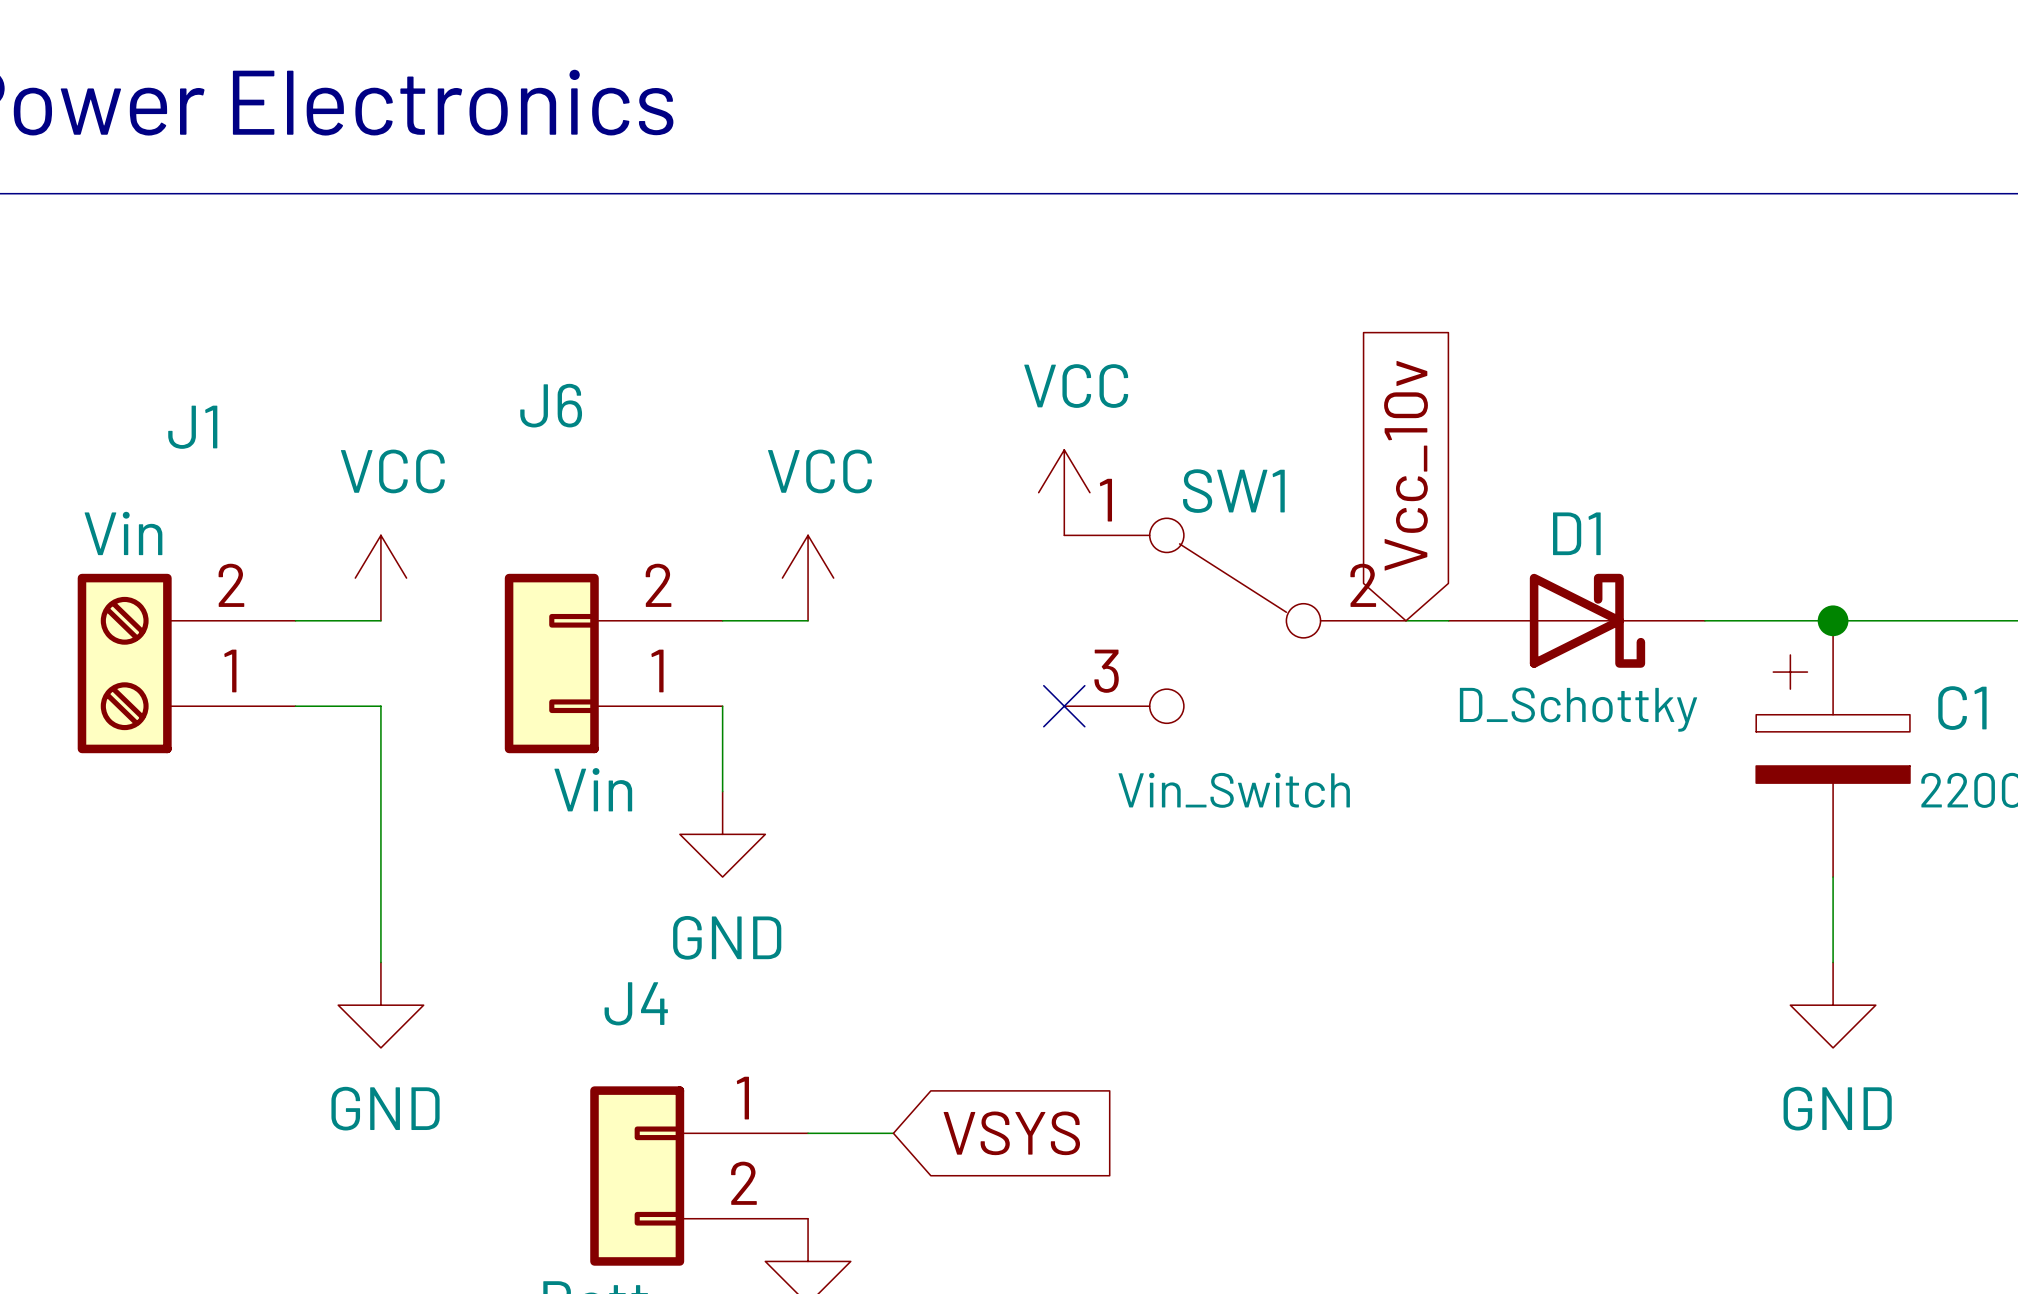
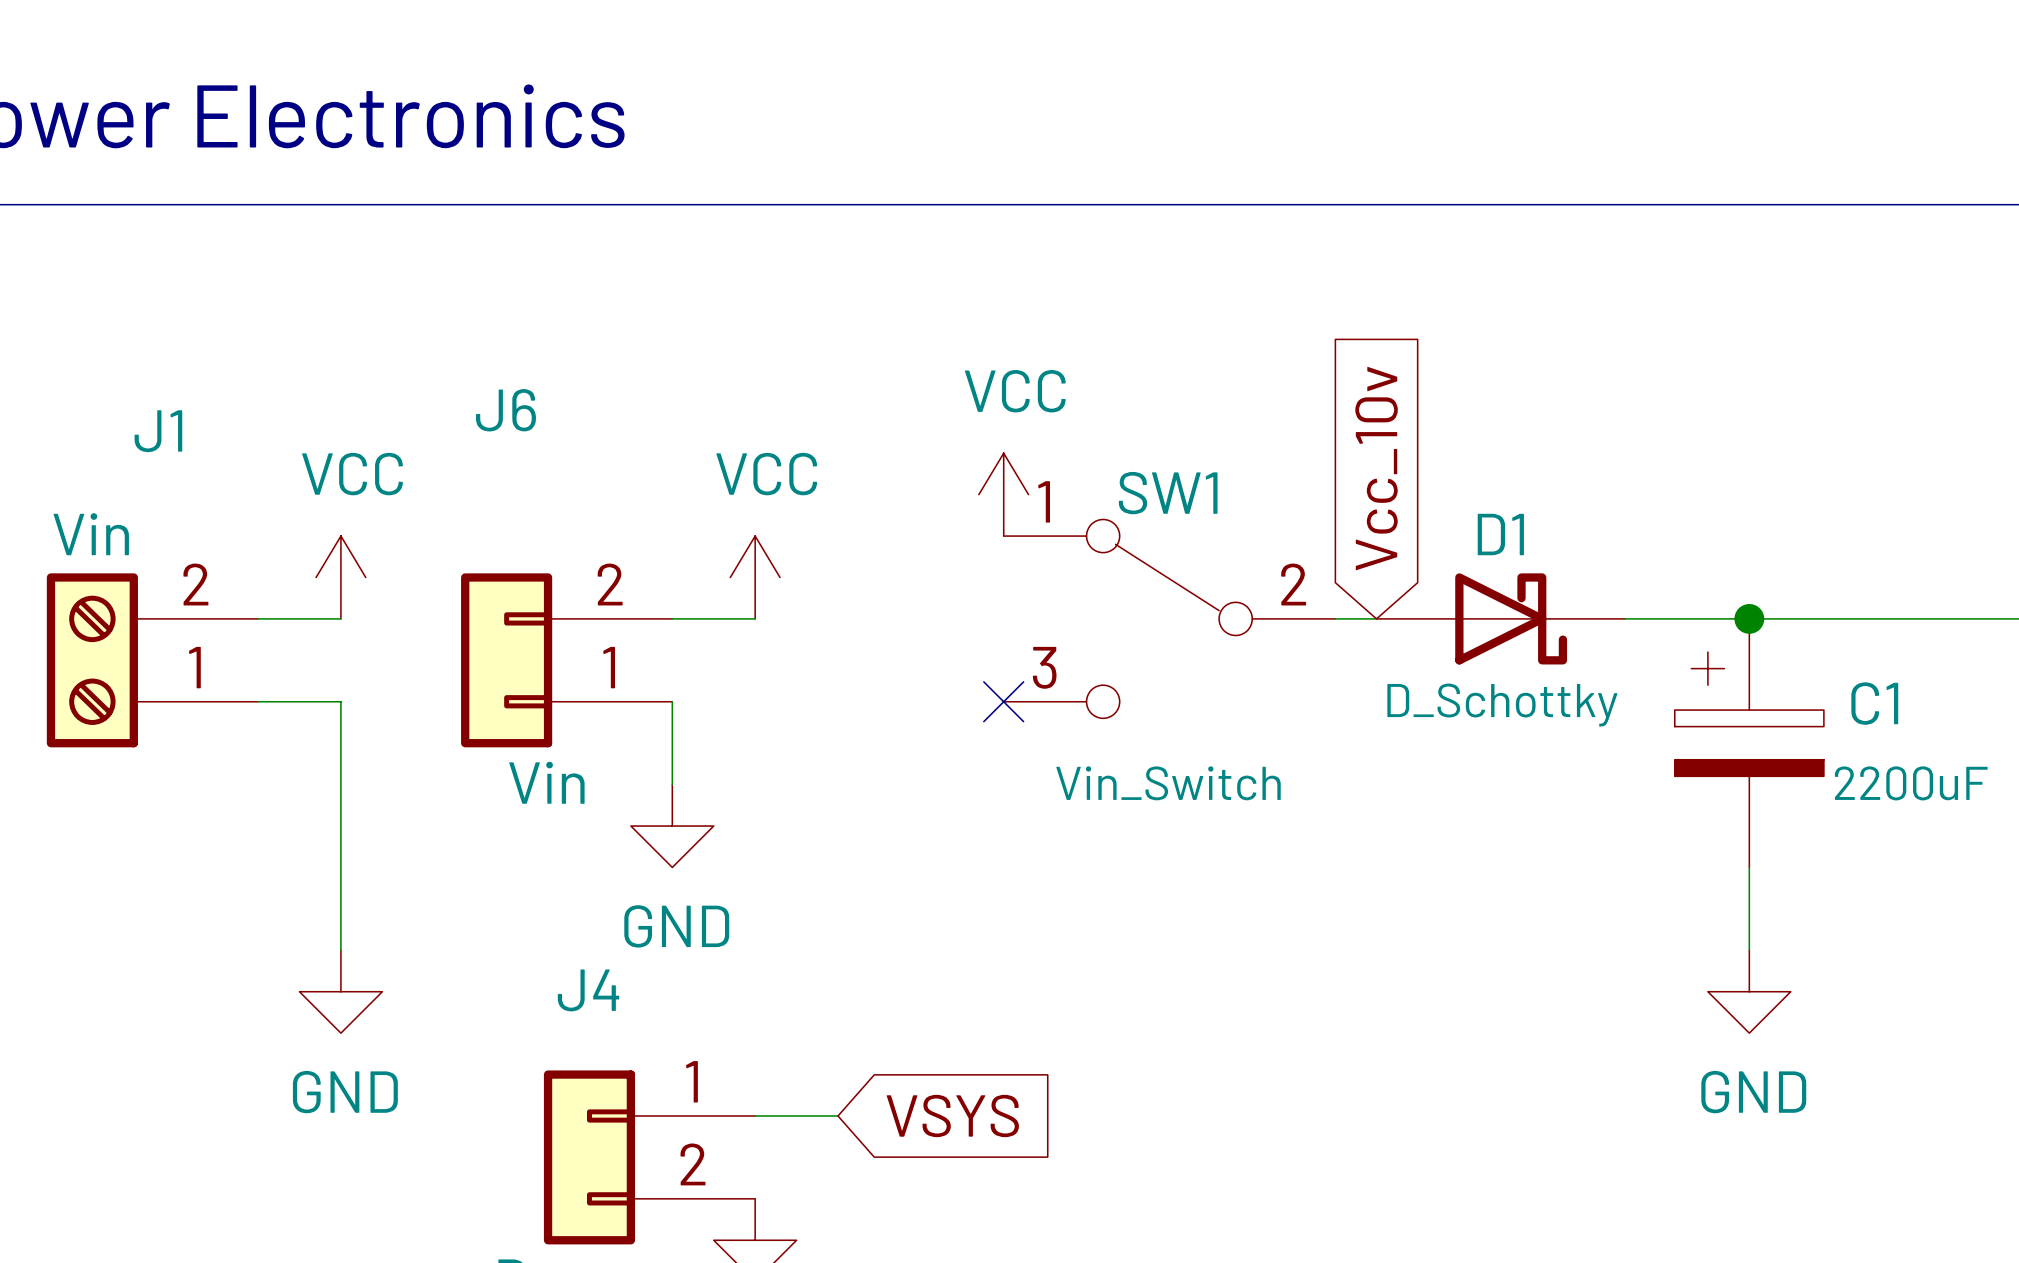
global label position: Vcc_10v (1406, 465) -> Vcc_10v (1376, 468)

